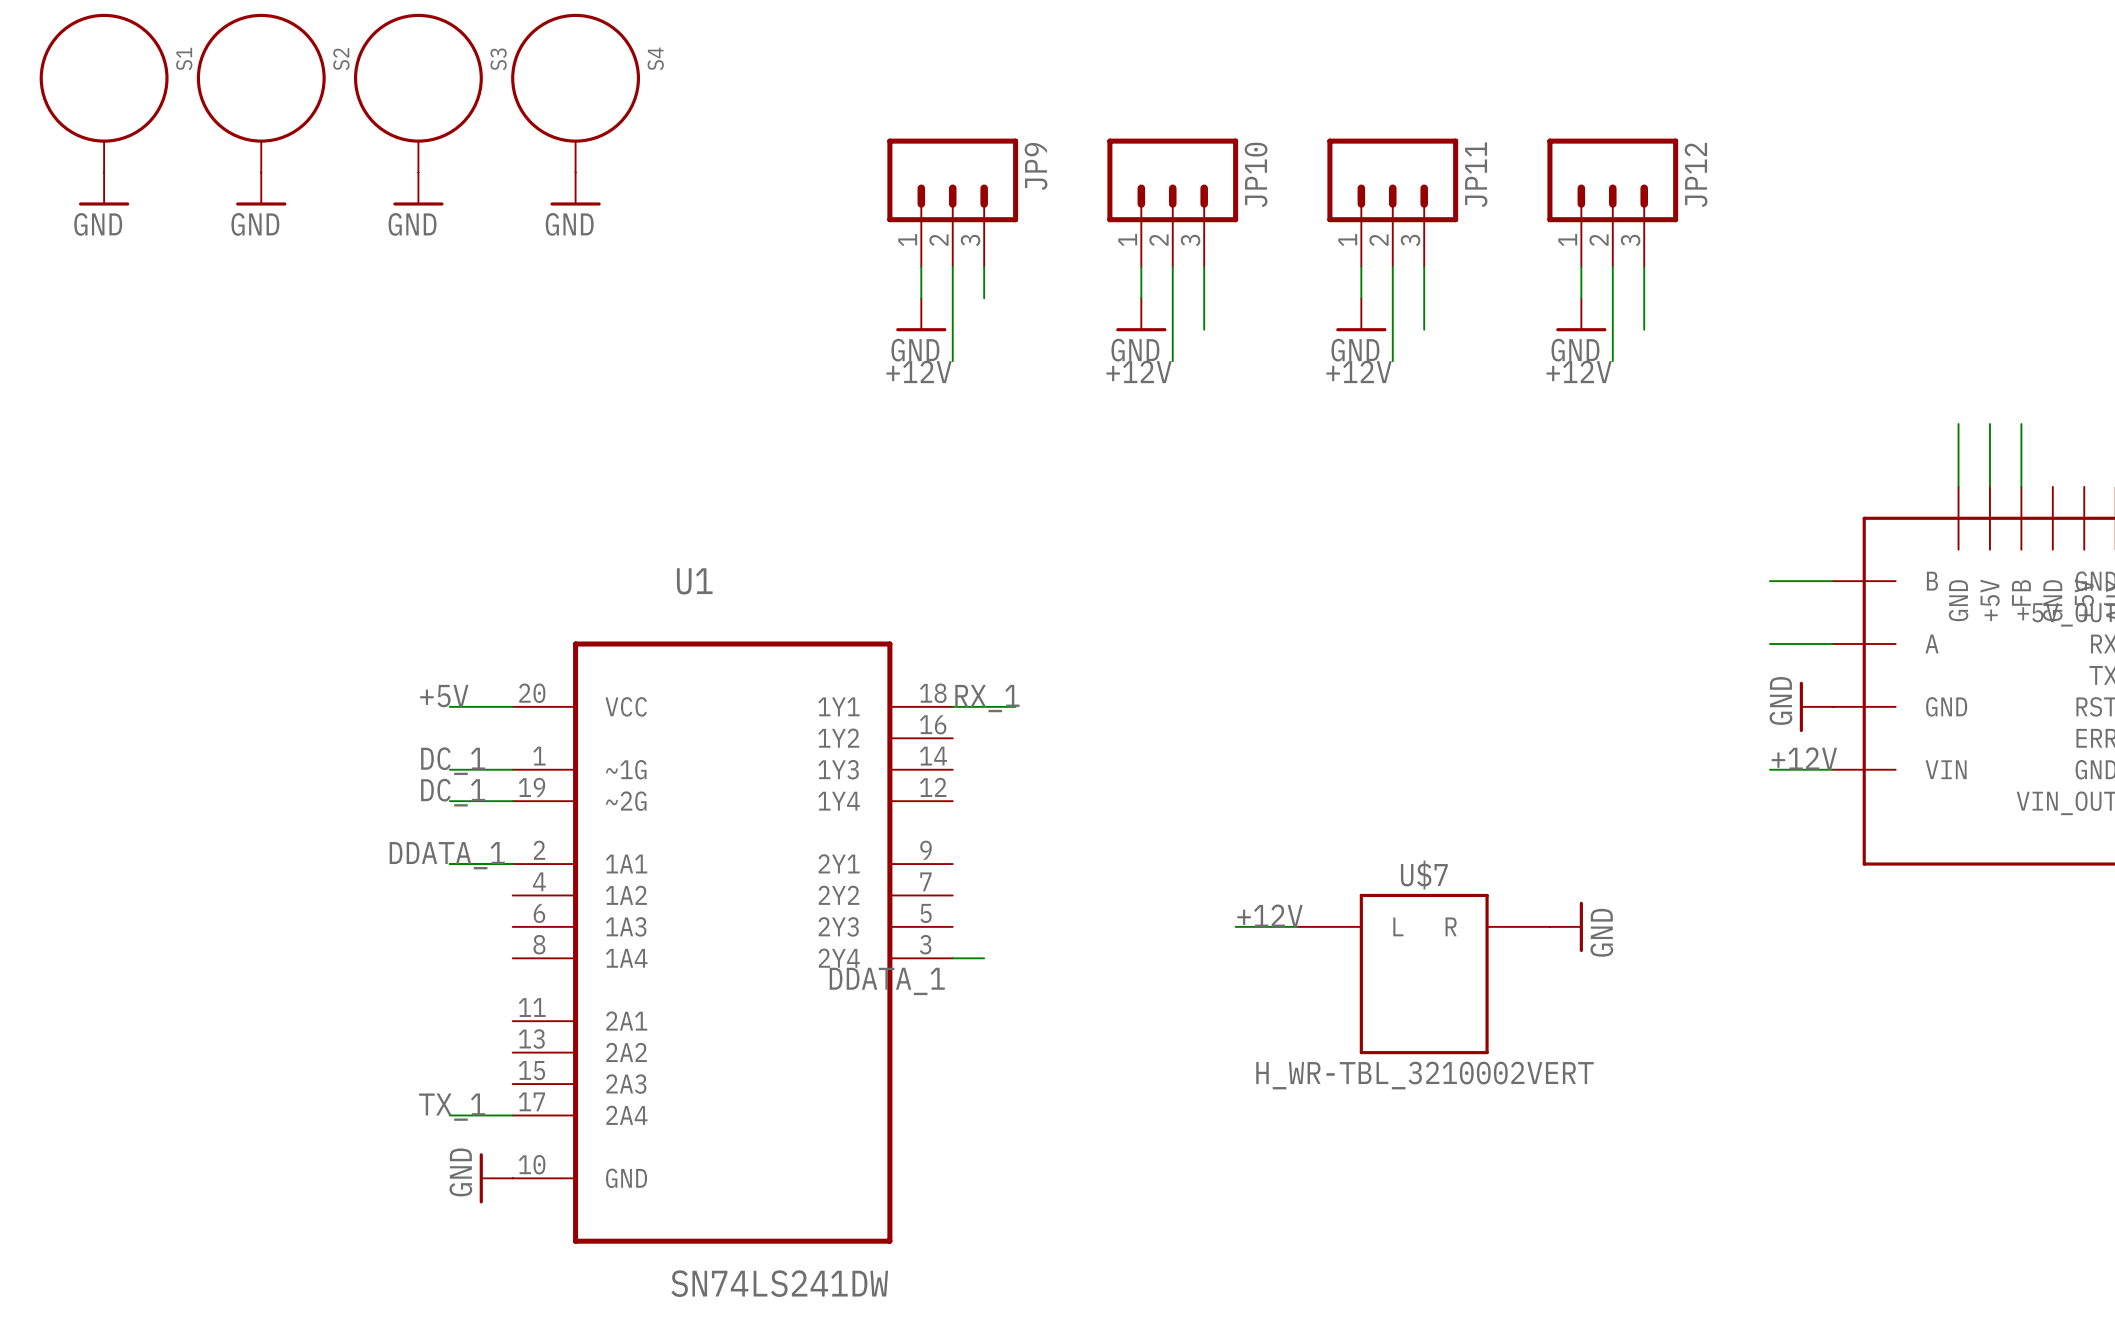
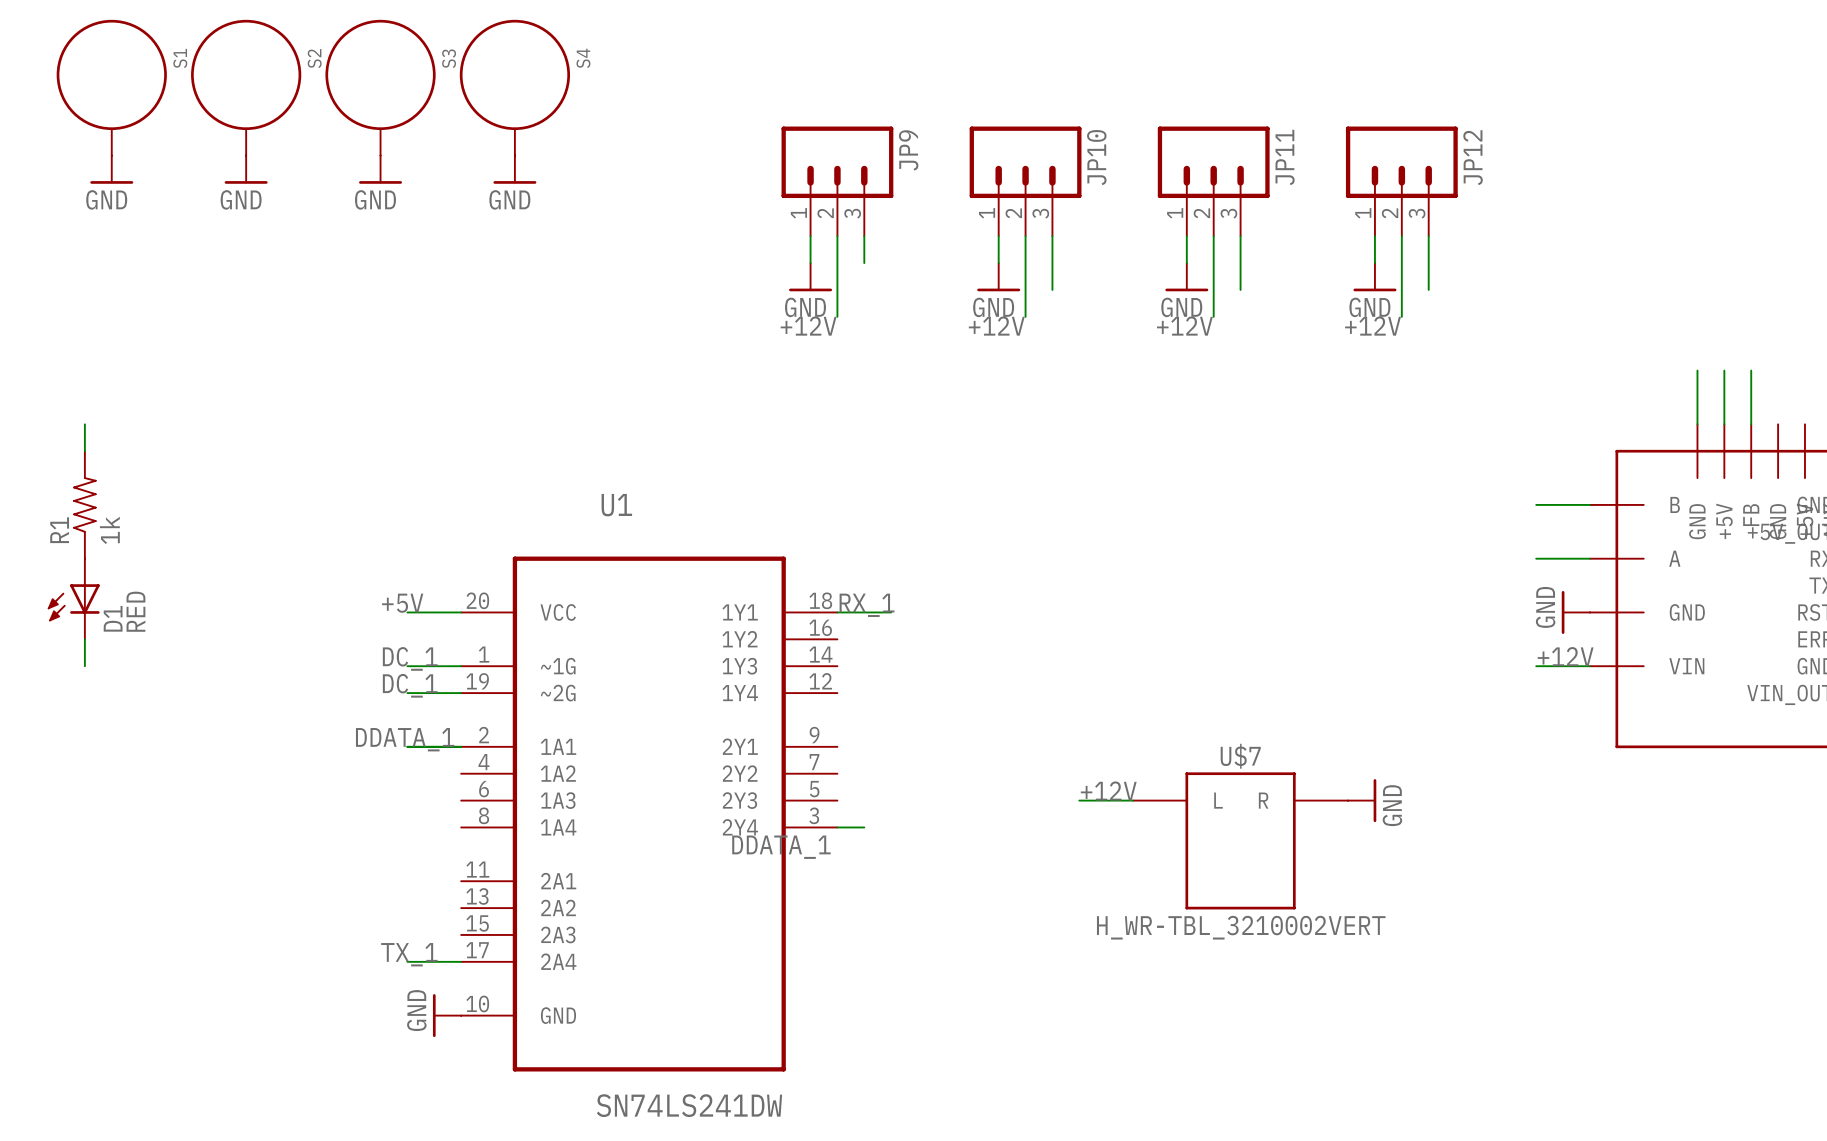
wire: none -> (84, 424) (84, 451)
R1: none -> 1k (84, 504)
D1: none -> RED (73, 599)
wire: none -> (84, 639) (84, 666)

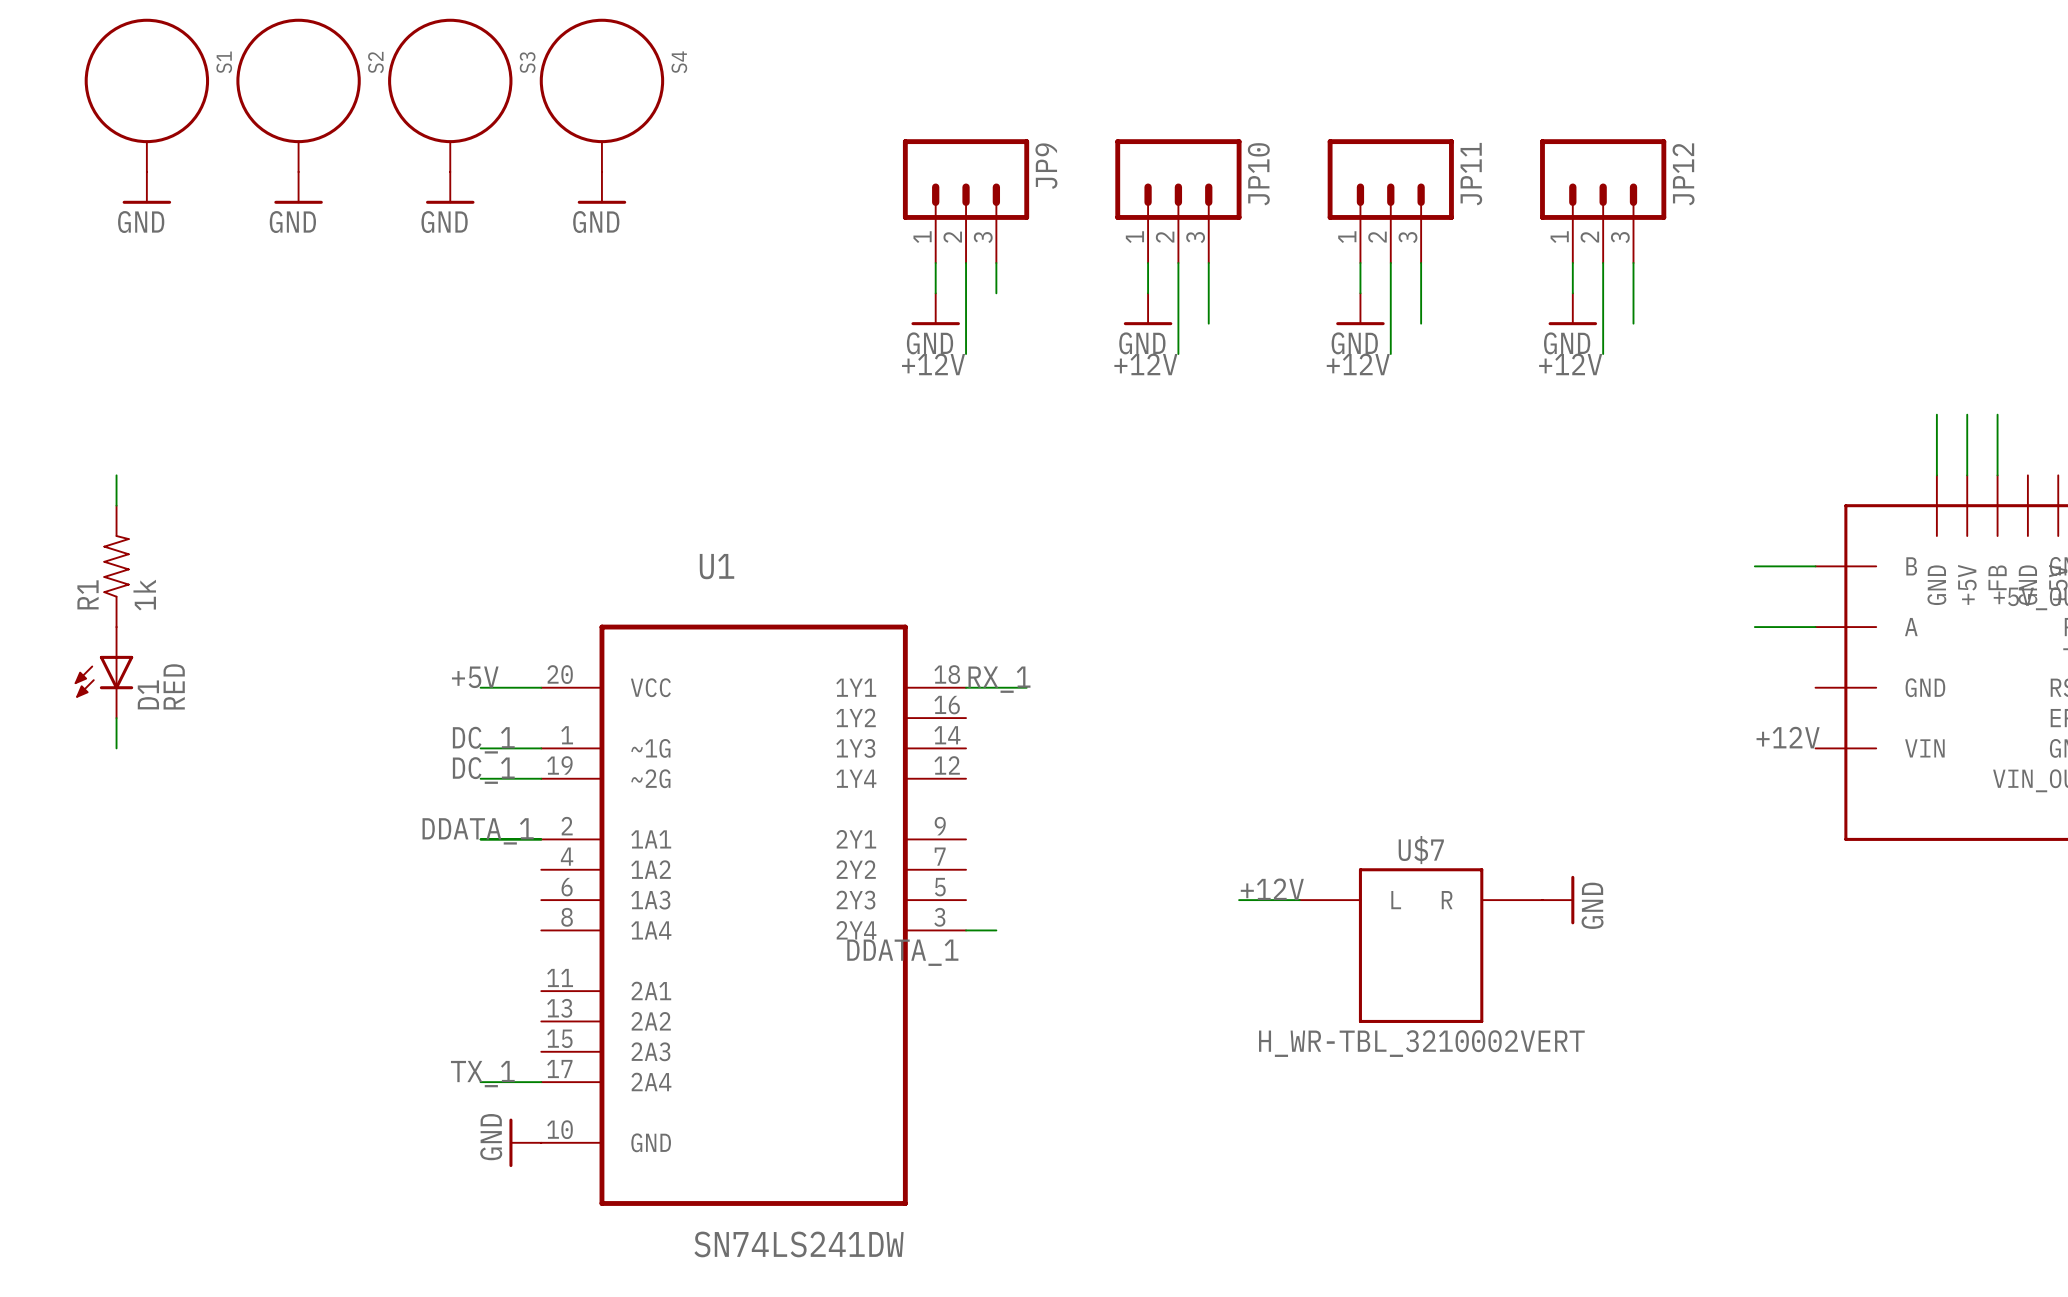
power symbol: GND (1575, 612) -> none
wire: (1536, 666) (1589, 666) -> none

